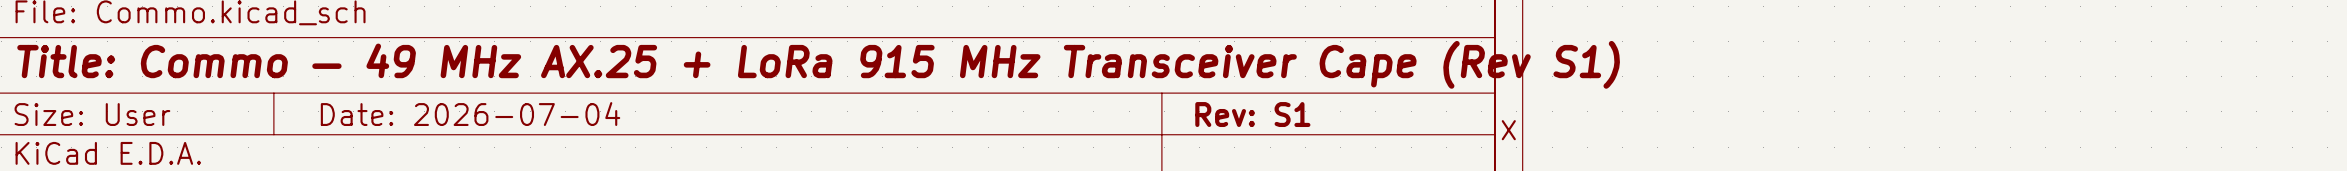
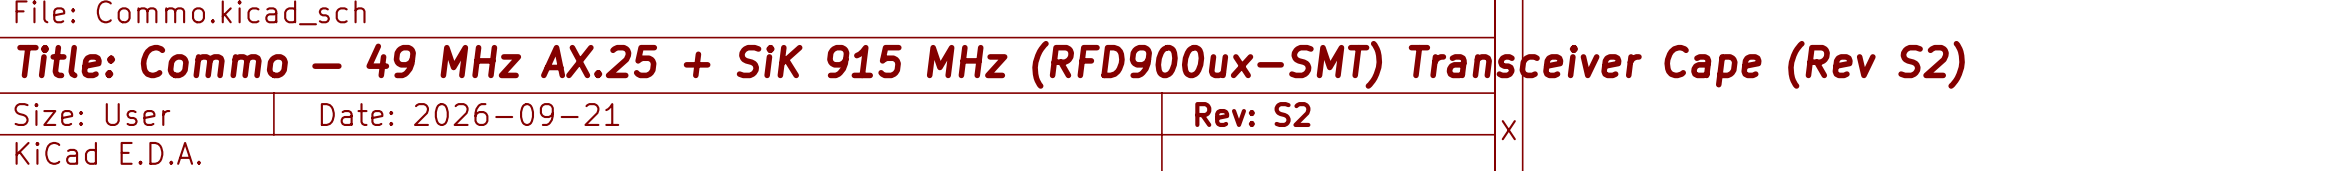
title block: Title: Commo — 49 MHz AX.25 + LoRa 915 MHz Transceiver Cape (Rev S1) (818, 64) -> Title: Commo — 49 MHz AX.25 + SiK 915 MHz (RFD900ux-SMT) Transceiver Cape (Rev S2) (991, 64)
title block: Date: 2026-07-04 (470, 114) -> Date: 2026-09-21 (470, 114)
title block: Rev: S1 (1252, 114) -> Rev: S2 (1252, 114)

